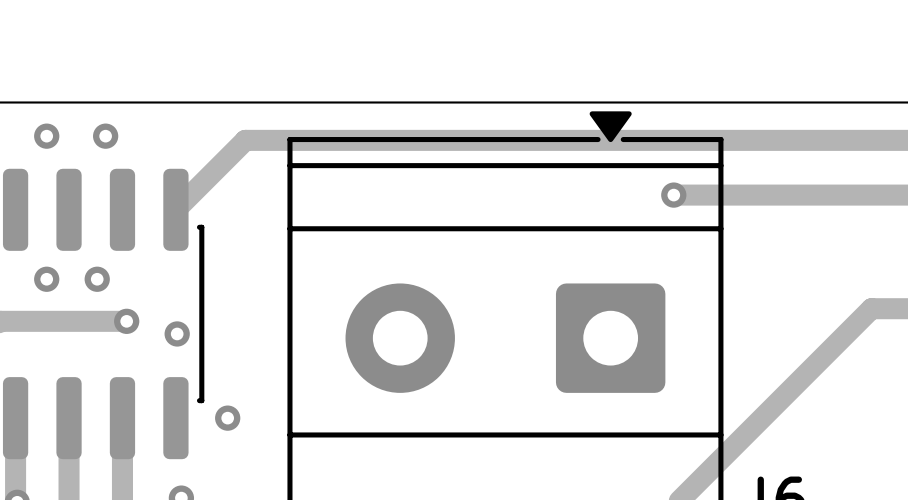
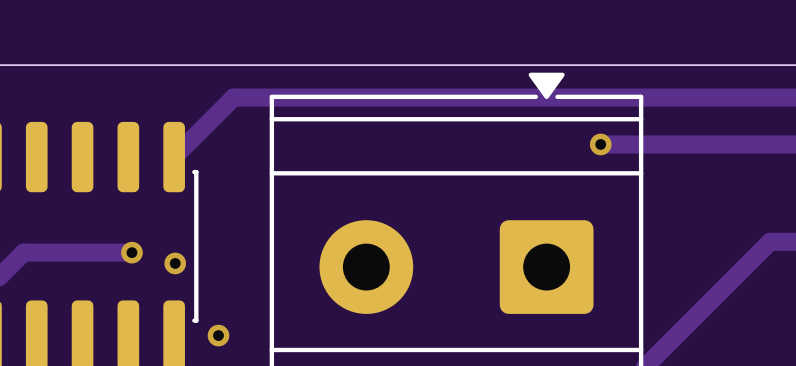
via: (46, 136) -> none
via: (105, 136) -> none
via: (46, 279) -> none
via: (97, 279) -> none

